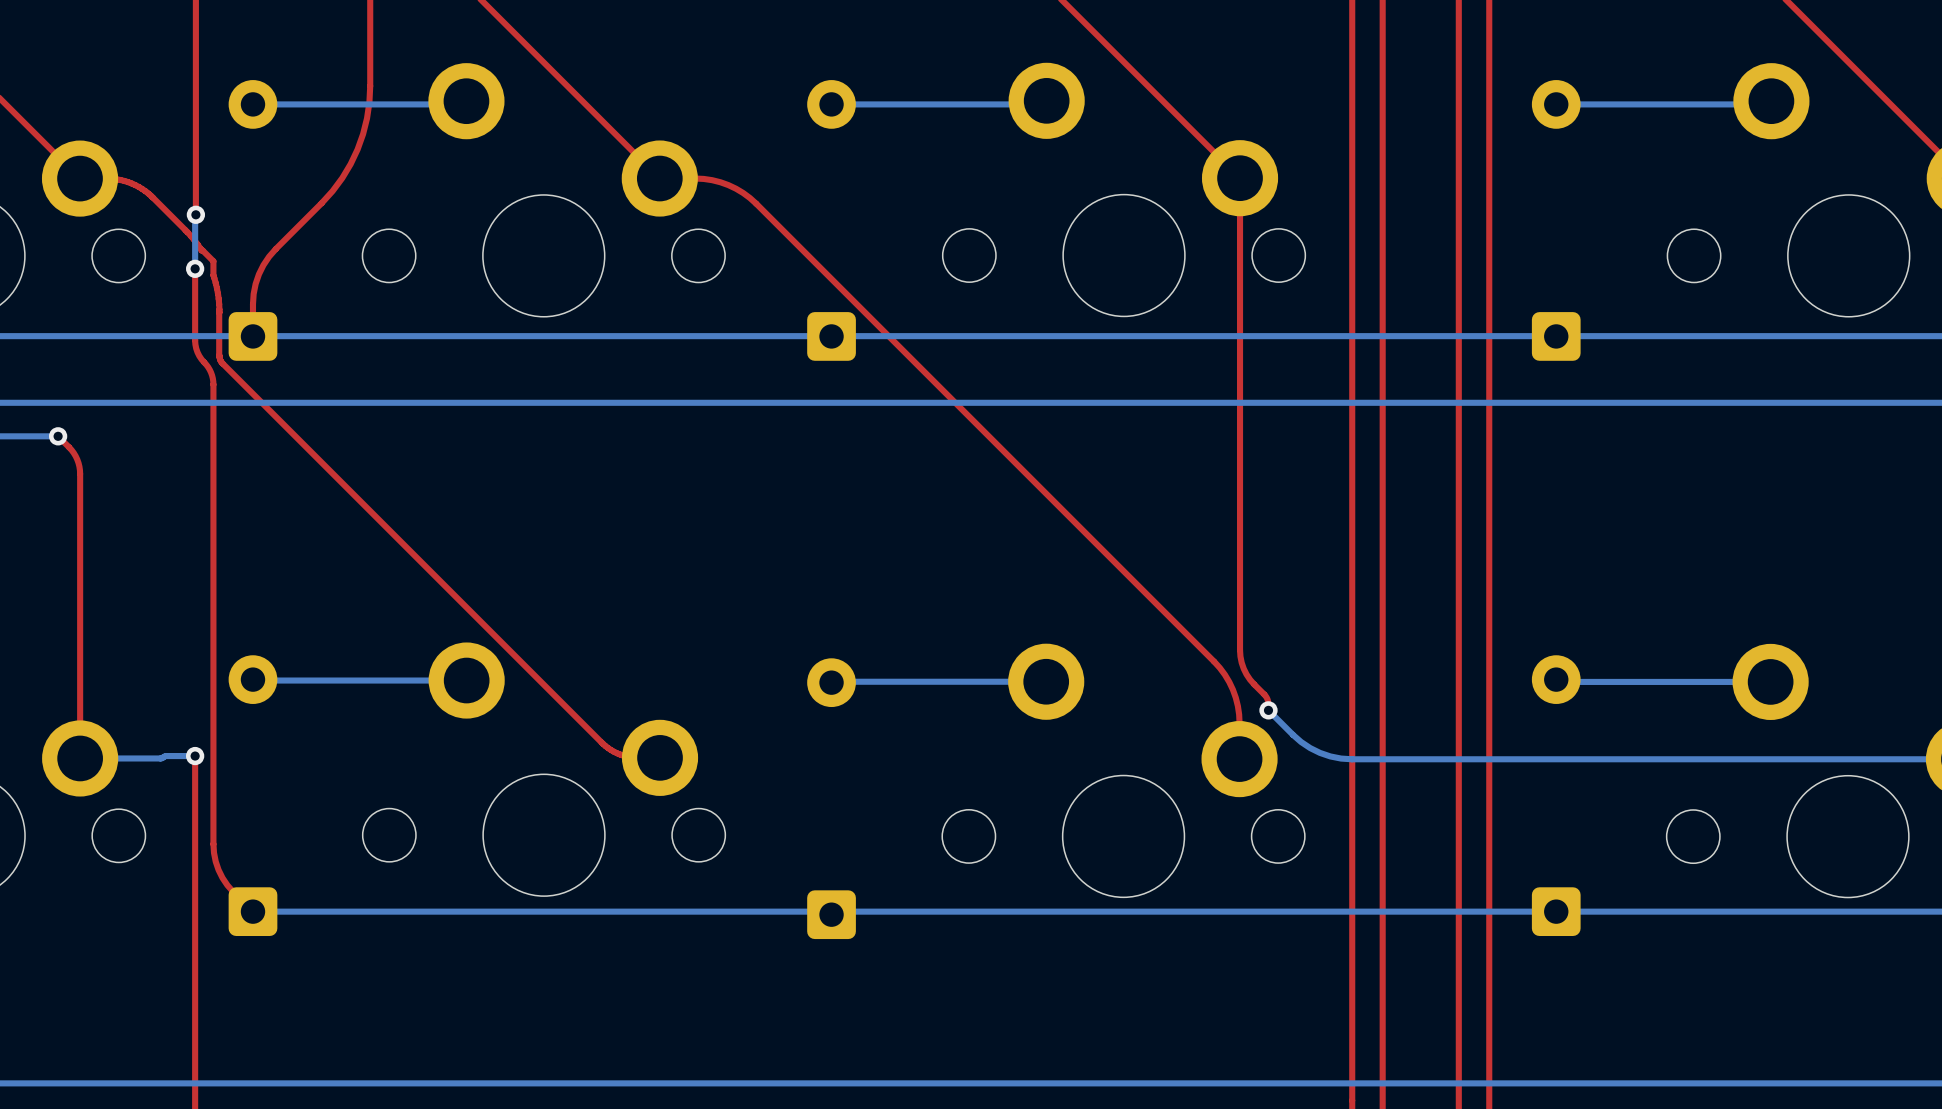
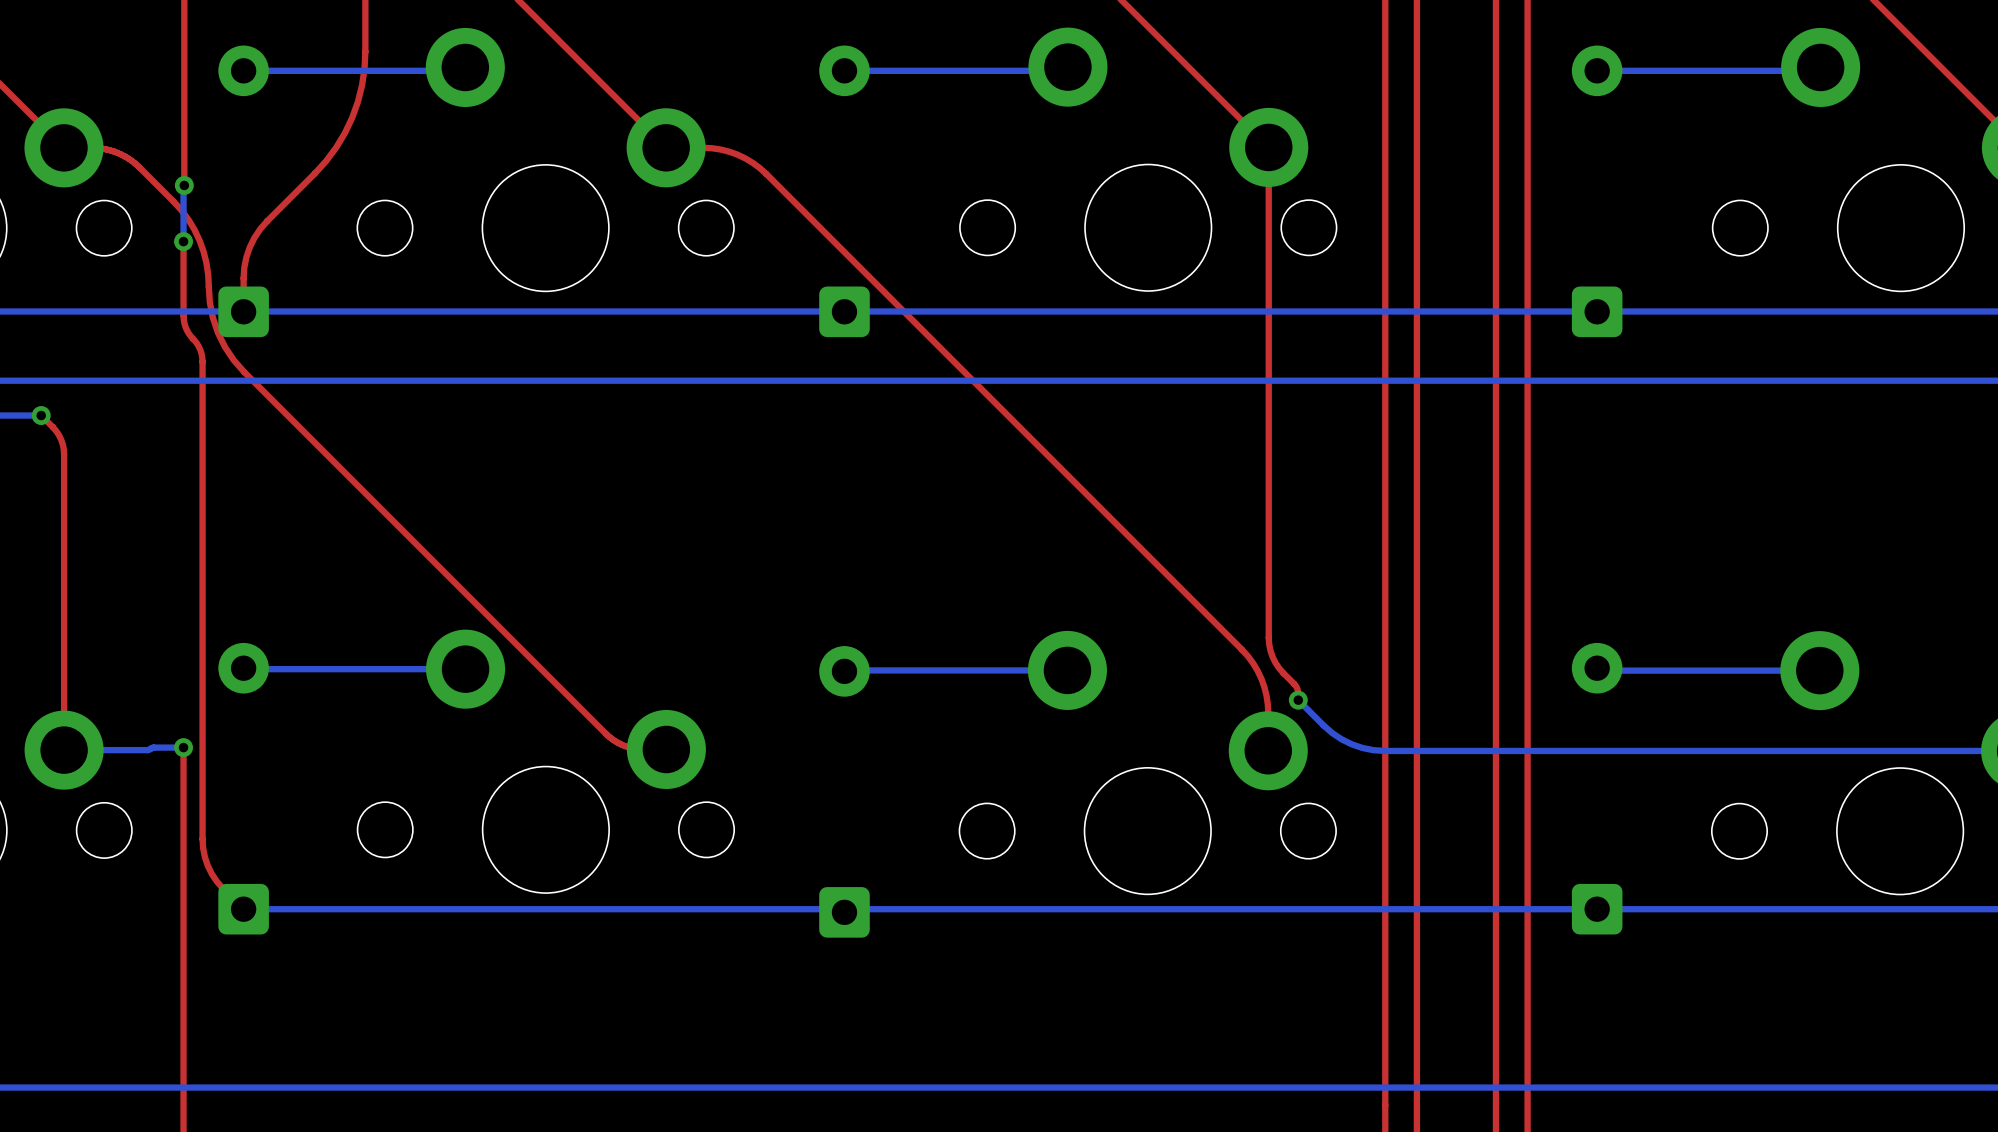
top track: (185, 230) (201, 250) (213, 261) (213, 275) (217, 293) (219, 312) -> (173, 201) (188, 219) (199, 240) (206, 263) (212, 317) (224, 346) (244, 371)
top track: (219, 312) (219, 355) -> none
top track: (219, 355) (222, 363) (253, 394) -> none

